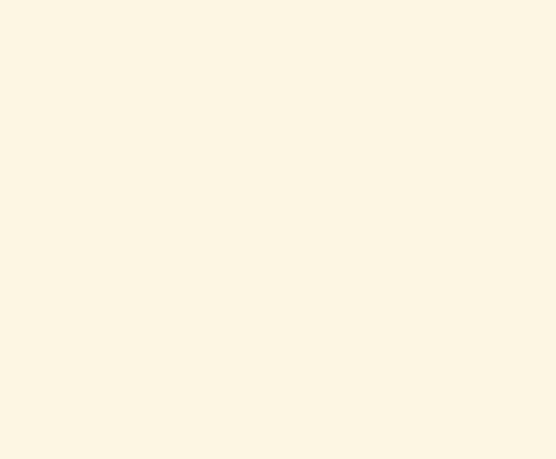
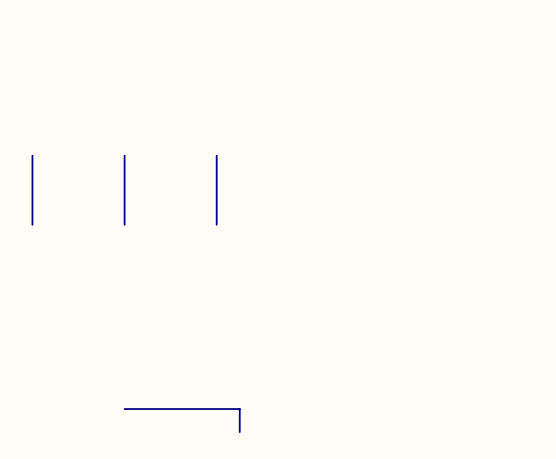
wire: none -> (32, 155) (32, 224)
wire: none -> (124, 155) (124, 224)
wire: none -> (216, 155) (216, 224)
wire: none -> (124, 409) (239, 409) (239, 432)

